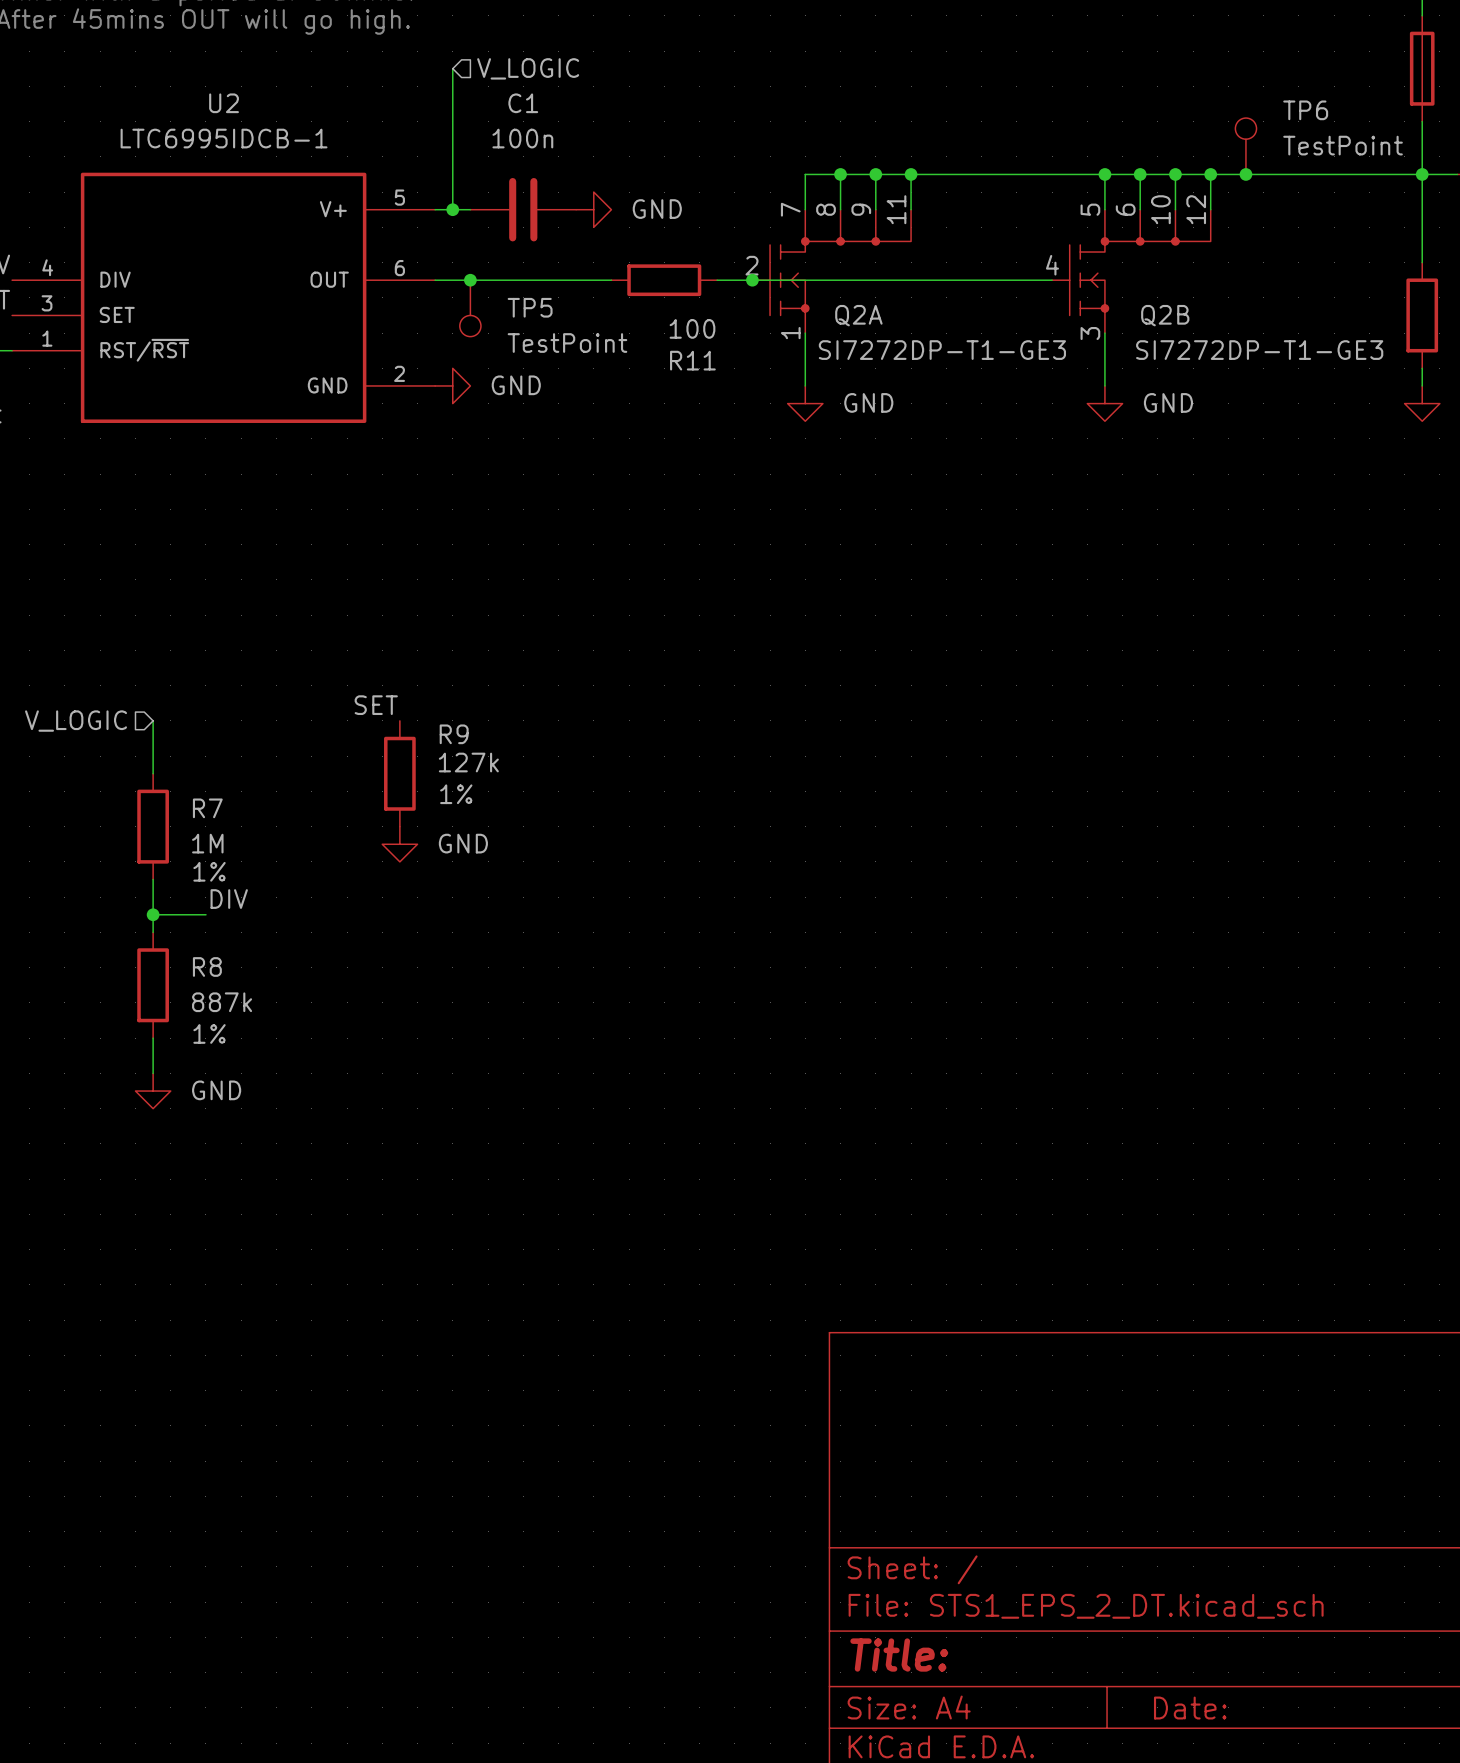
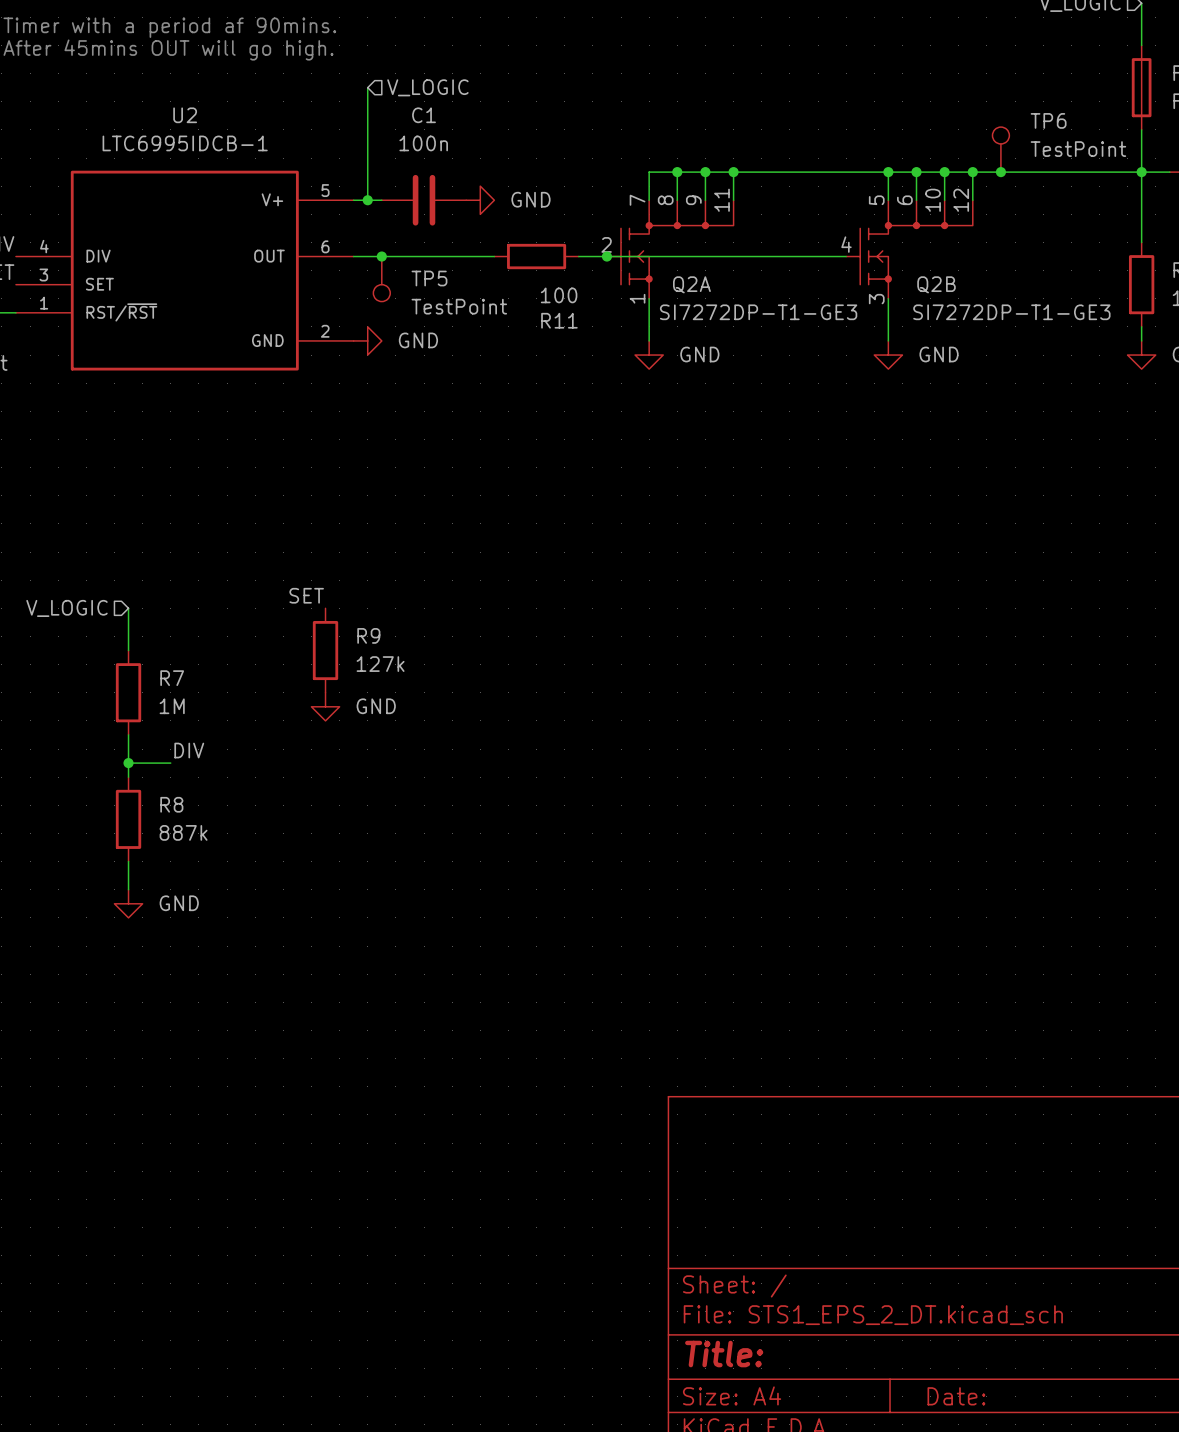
R9 name position: R9 (454, 734) -> R9 (368, 635)
R9 value position: 127k (468, 762) -> 127k (380, 664)
R9 text: 1% (456, 794) -> none
R7 text: 1% (209, 871) -> none
R8 text: 1% (209, 1033) -> none

